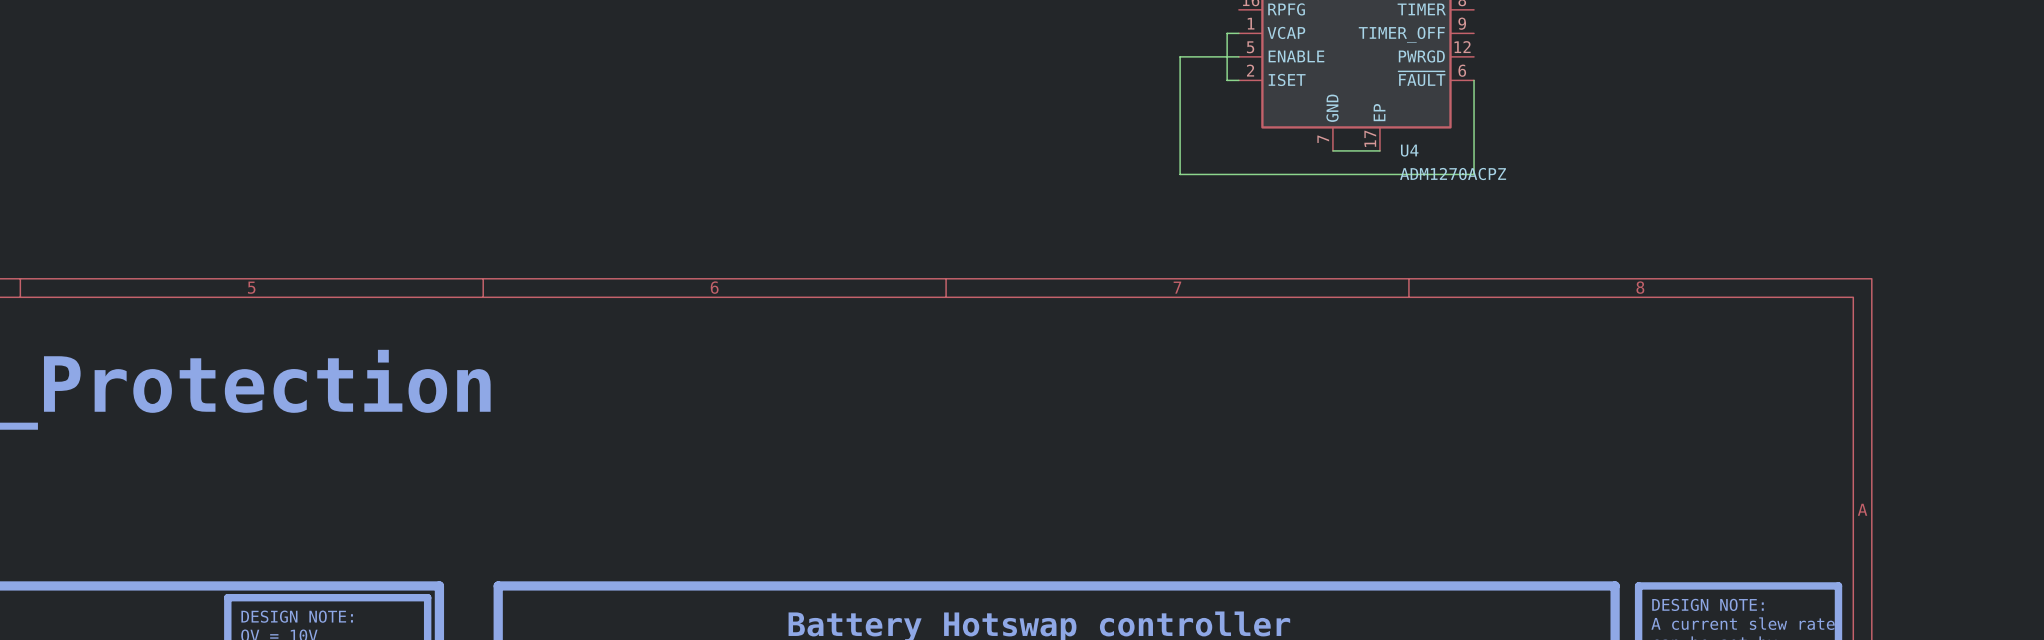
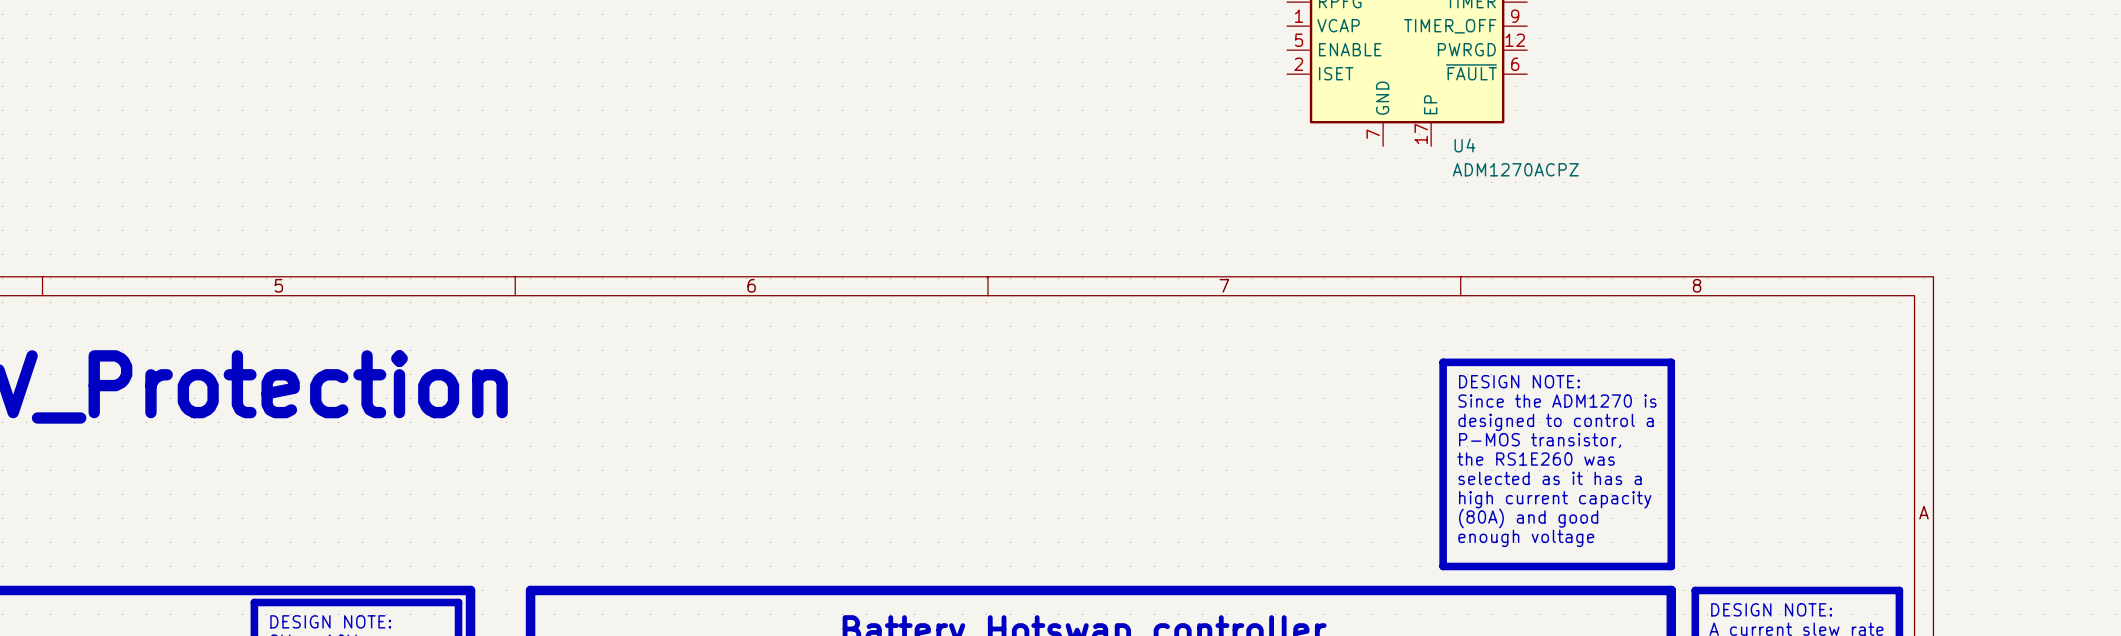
wire: (1238, 33) (1227, 33) (1227, 80) (1238, 80) -> none
wire: (1238, 56) (1180, 56) (1180, 174) (1474, 174) (1474, 80) -> none
wire: (1332, 150) (1379, 150) -> none
line: none -> (1443, 362) (1671, 362) (1671, 566) (1443, 566) (1443, 362)
text: none -> DESIGN NOTE: (1519, 381)
text: none -> Since the ADM1270 is (1557, 401)
text: none -> designed to control a (1556, 422)
text: none -> P-MOS transistor, (1540, 440)
text: none -> the RS1E260 was (1536, 459)
text: none -> selected as it has a (1550, 478)
text: none -> high current capacity (1555, 499)
text: none -> (80A) and good (1528, 518)
text: none -> enough voltage (1526, 538)

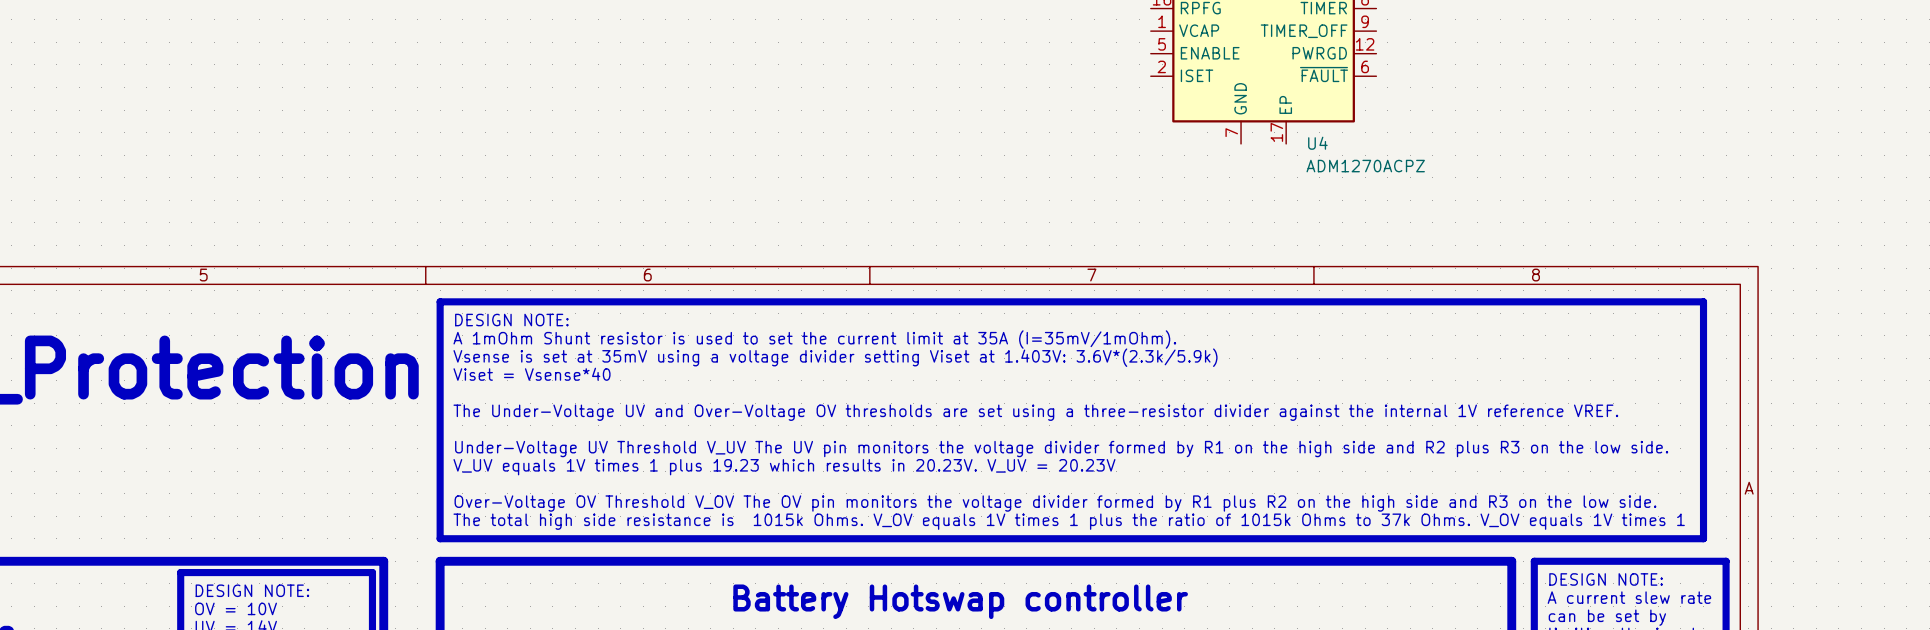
text: none -> DESIGN NOTE: (511, 320)
text: none -> A 1mOhm Shunt resistor is used to set the current limit at 35A (I=35mV/1mOhm). (814, 339)
text: none -> Vsense is set at 35mV using a voltage divider setting Viset at 1.403V: 3.6V*(2.3k/5.9k) (835, 357)
text: DESIGN NOTE: (1519, 381) -> none
text: none -> Viset = Vsense*40 (532, 374)
text: Since the ADM1270 is (1557, 401) -> none
text: designed to control a (1556, 422) -> none
text: none -> The Under-Voltage UV and Over-Voltage OV thresholds are set using a three-resistor divider against the internal 1V reference VREF. (1035, 412)
text: P-MOS transistor, (1540, 440) -> none
text: the RS1E260 was (1536, 459) -> none
text: none -> Under-Voltage UV Threshold V_UV The UV pin monitors the voltage divider formed by R1 on the high side and R2 plus R3 on the low side. (1061, 449)
text: selected as it has a (1550, 478) -> none
text: none -> V_UV equals 1V times 1 plus 19.23 which results in 20.23V. V_UV = 20.23V (784, 467)
text: high current capacity (1555, 499) -> none
text: (80A) and good (1528, 518) -> none
text: none -> Over-Voltage OV Threshold V_OV The OV pin monitors the voltage divider formed by R1 plus R2 on the high side and R3 on the low side. (1055, 503)
text: enough voltage (1526, 538) -> none
text: none -> The total high side resistance is 1015k Ohms. V_OV equals 1V times 1 plus the ratio of 1015k Ohms to 37k Ohms. V_OV equals 1V times 1 (1069, 521)
line: (1443, 566) (1443, 362) (1671, 362) (1671, 566) -> (1297, 538) (440, 538) (440, 301) (1703, 301) (1703, 538) (1511, 538)

